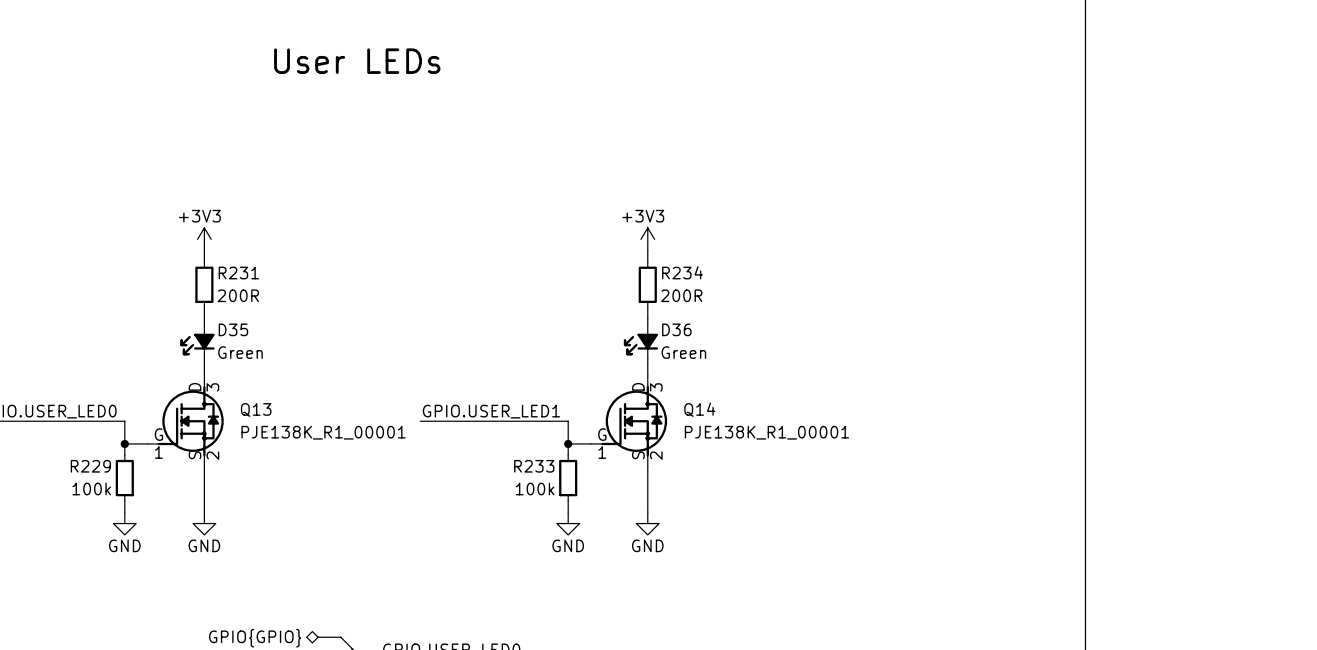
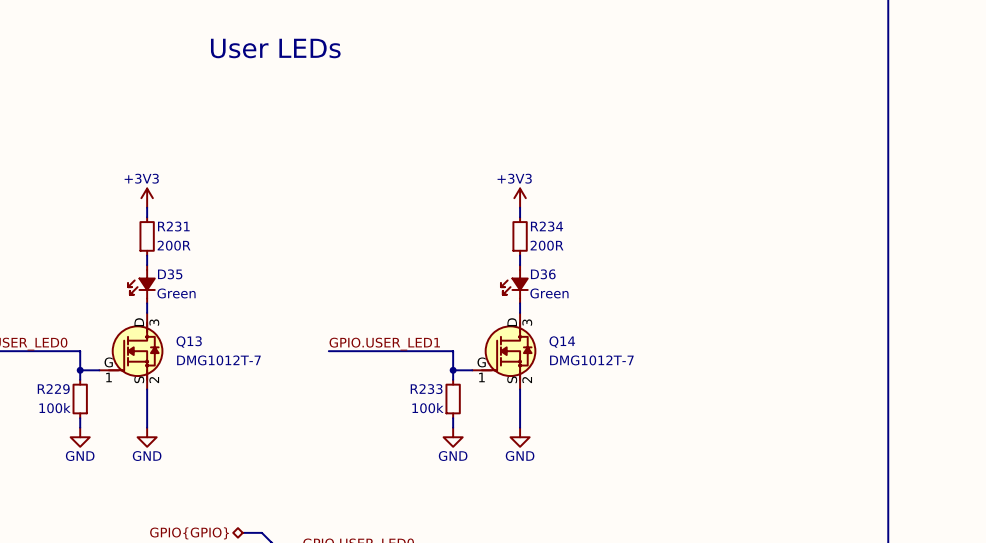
Q13 text: PJE138K_R1_00001 (323, 432) -> DMG1012T-7 (218, 360)
Q14 text: PJE138K_R1_00001 (766, 432) -> DMG1012T-7 (591, 360)

